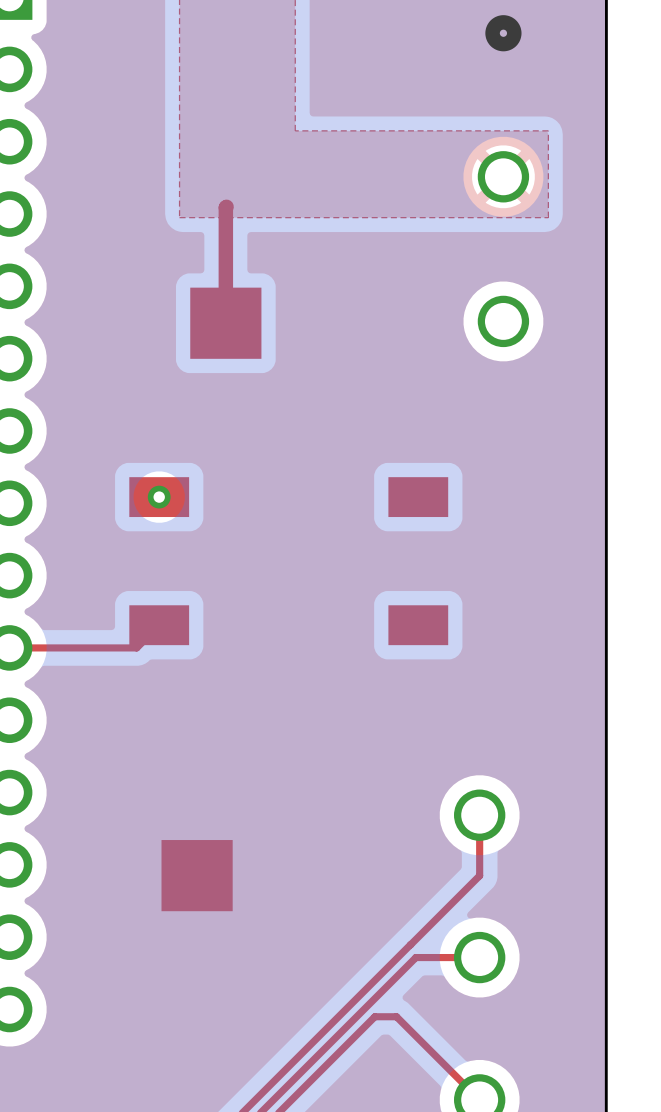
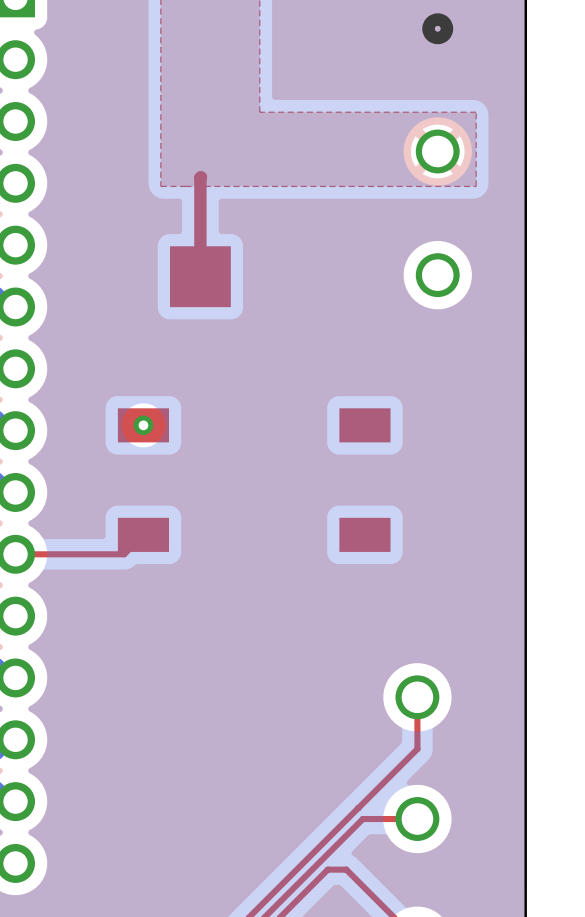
part: (197, 875) -> none

